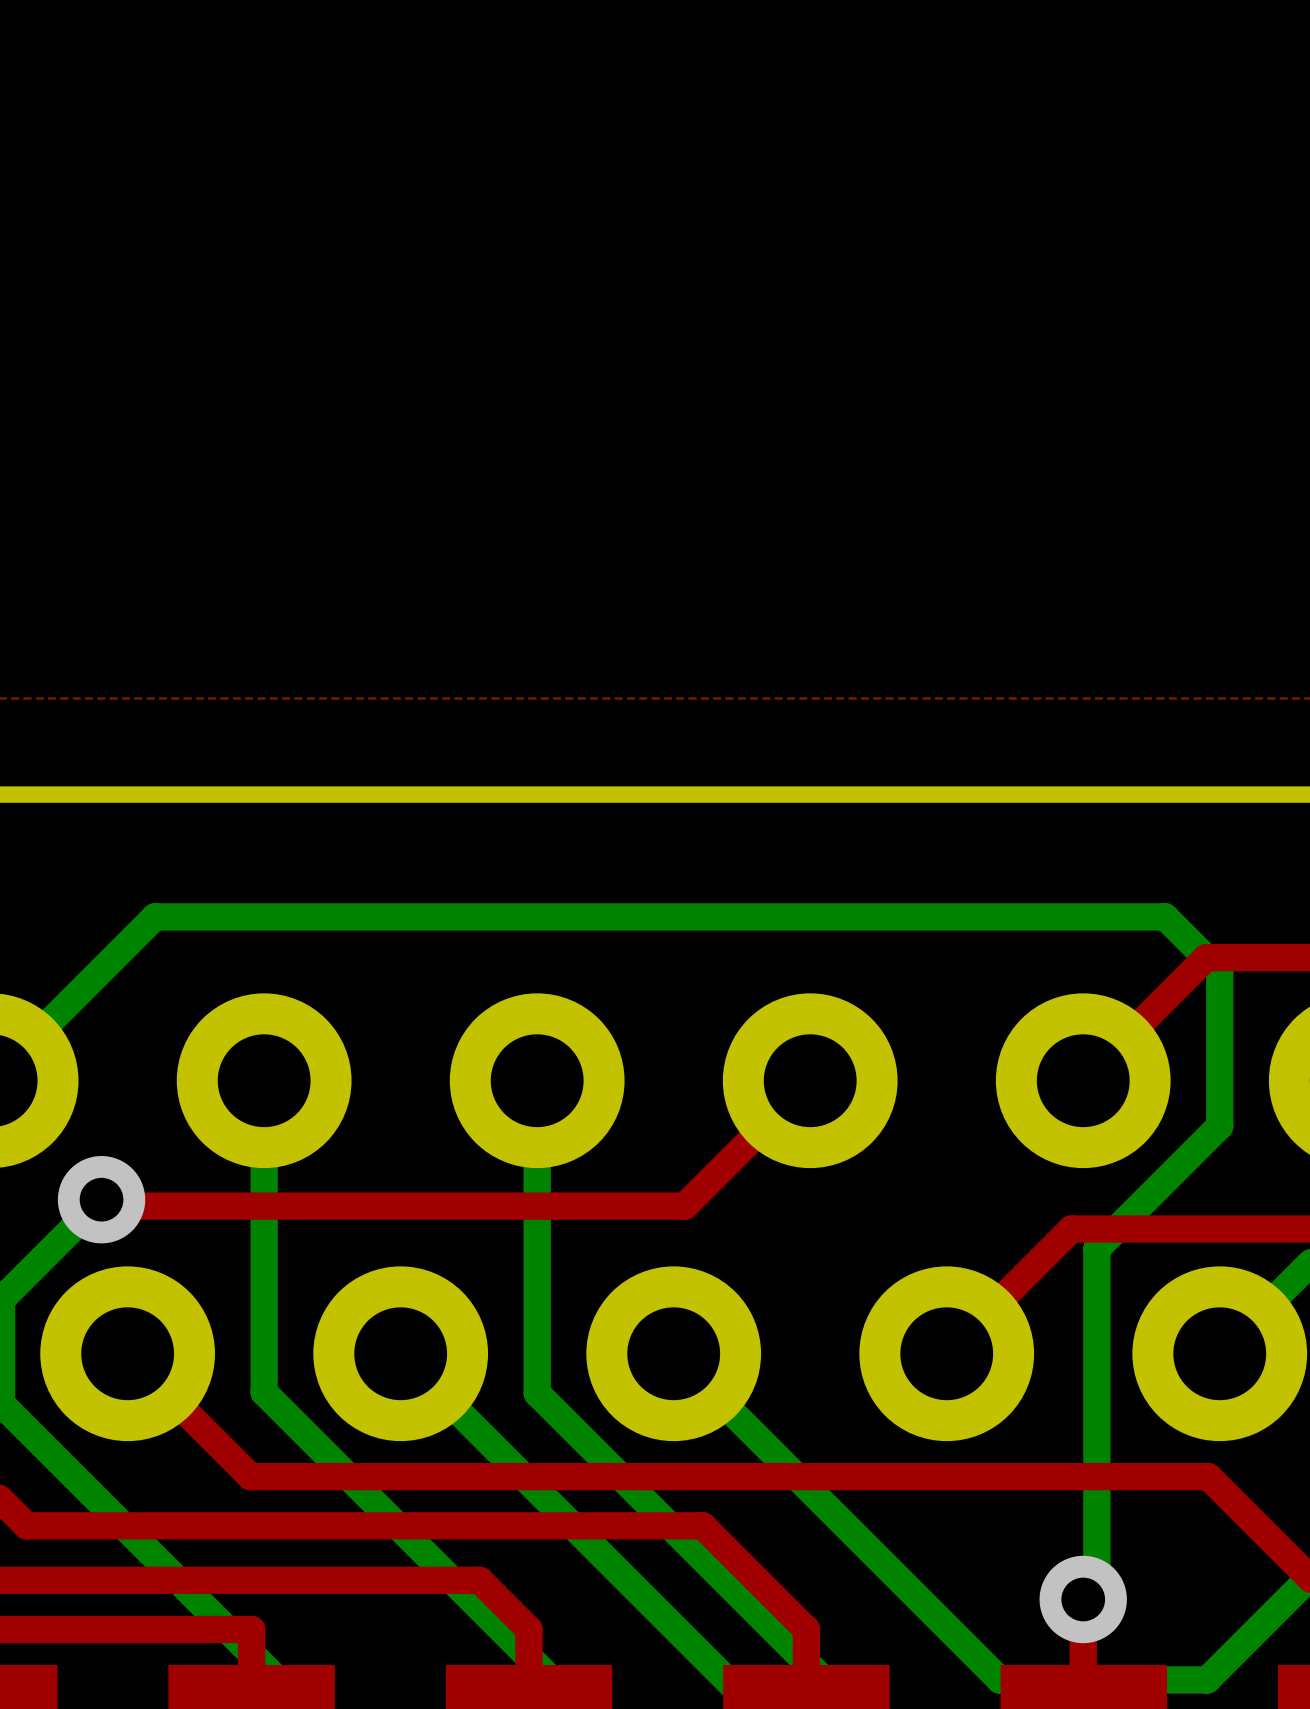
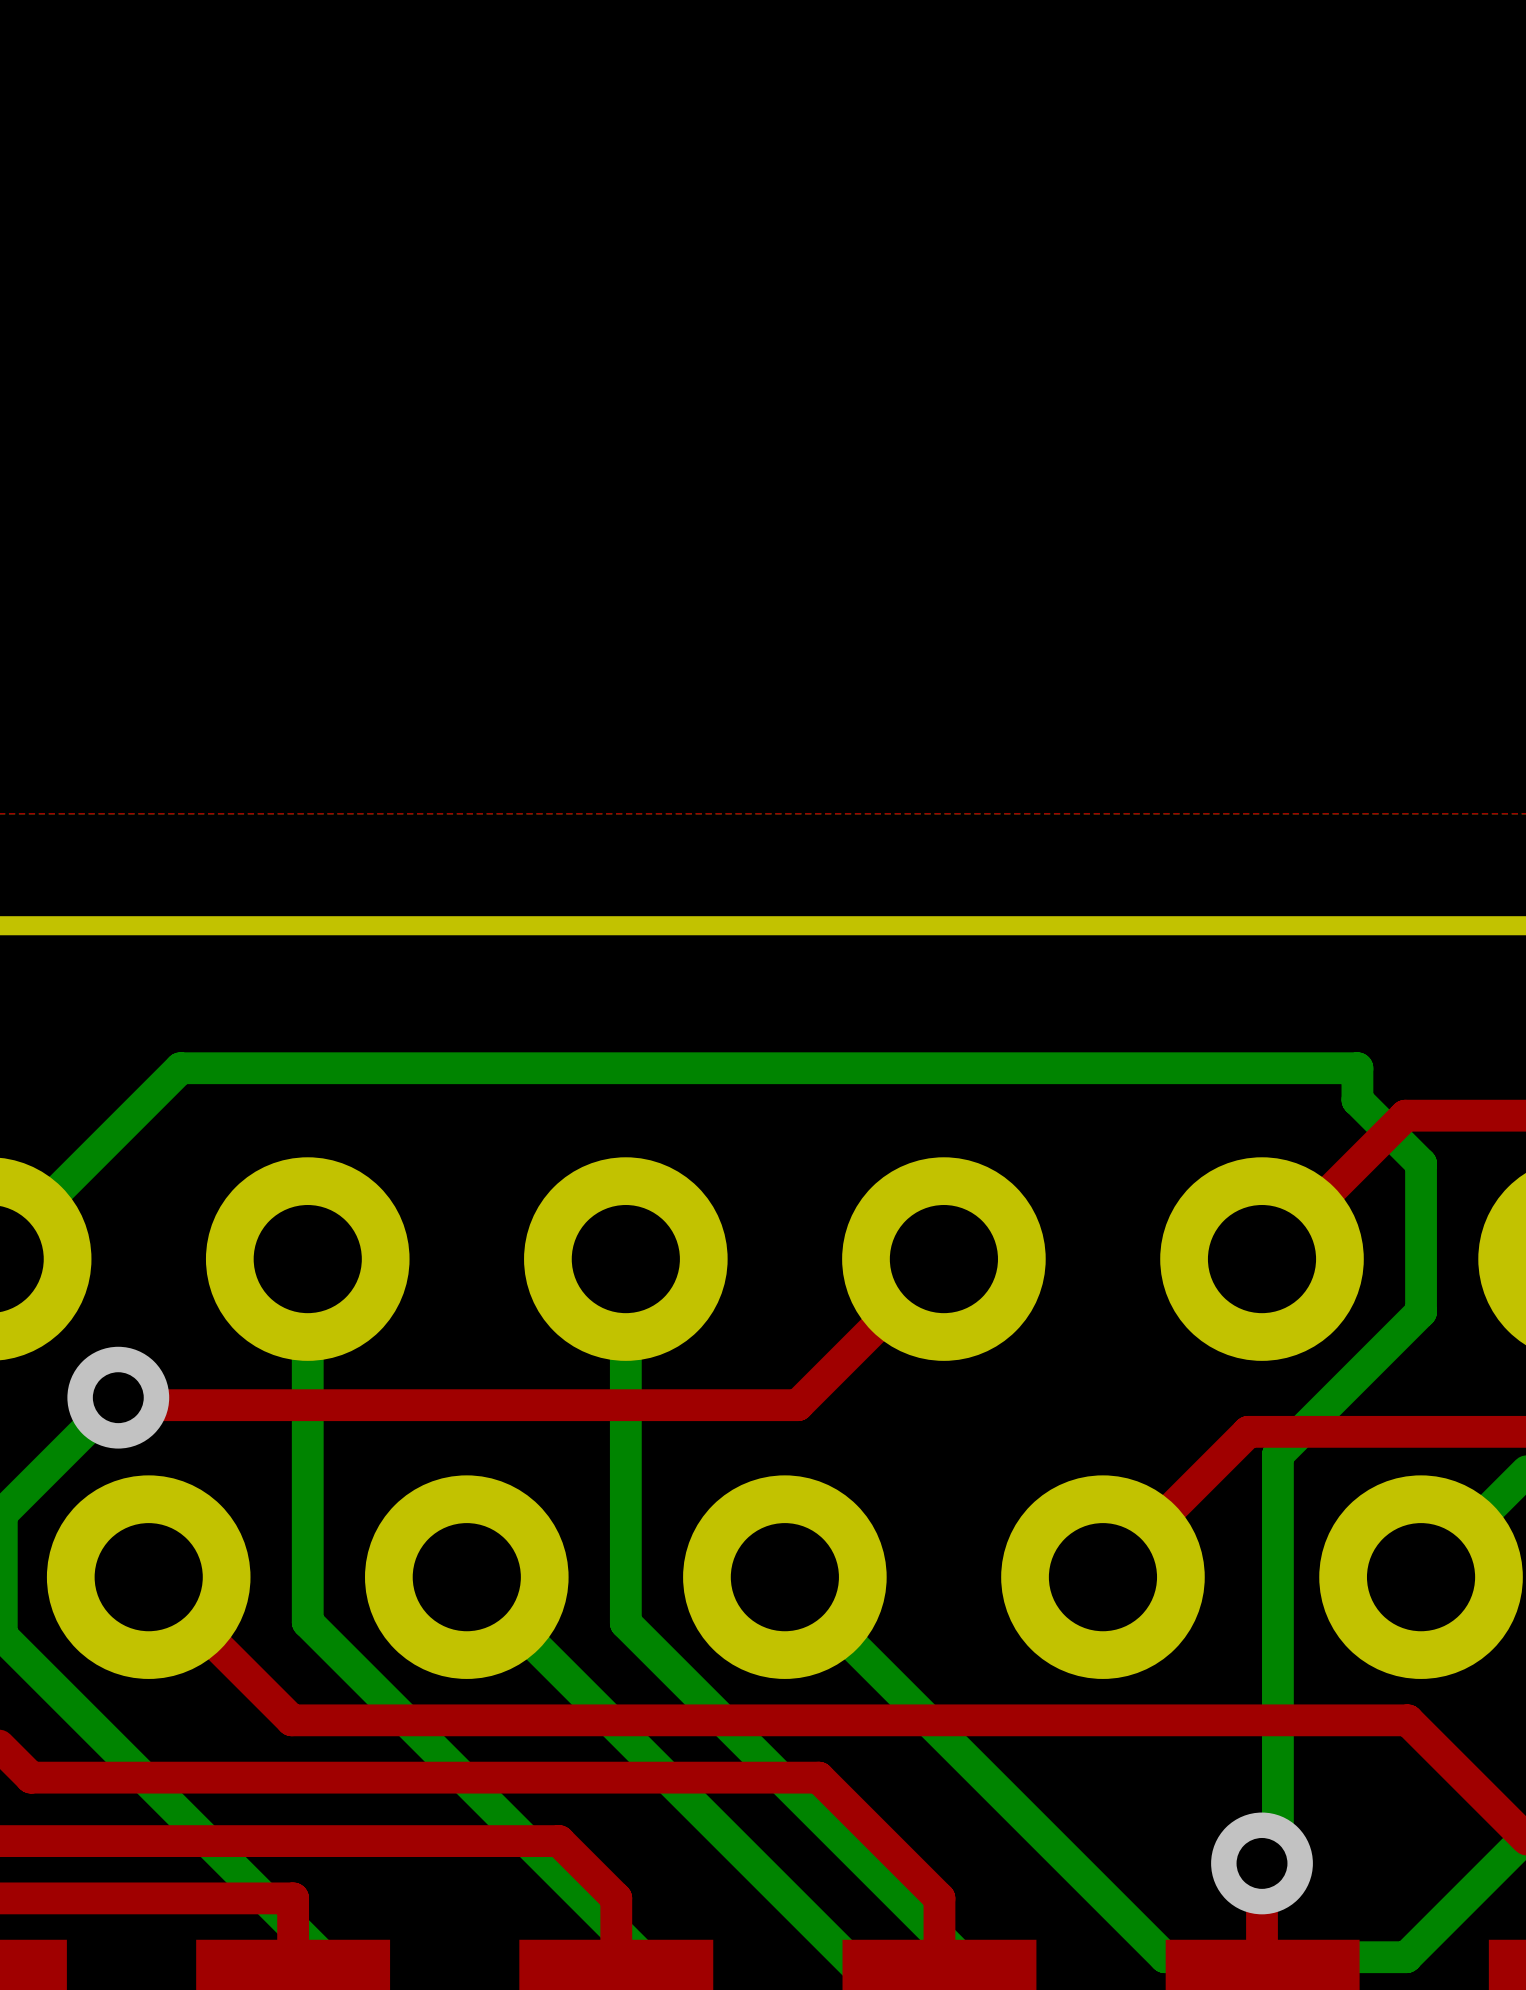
bottom track: (1165, 916) (1219, 971) (1219, 998) -> (1357, 1068) (1357, 1100) (1421, 1163)

